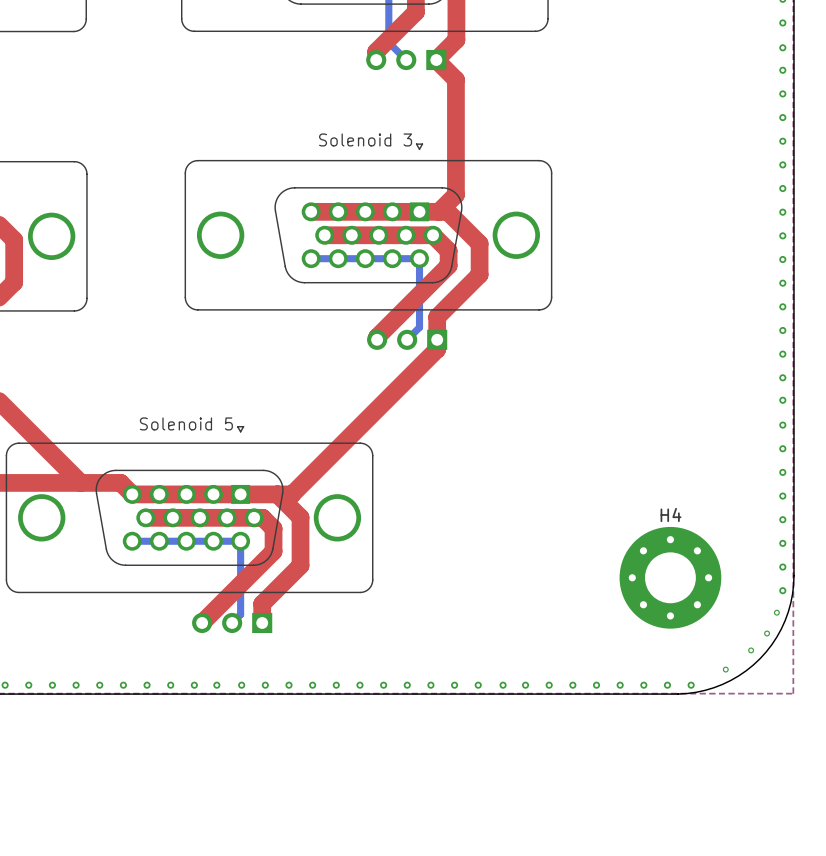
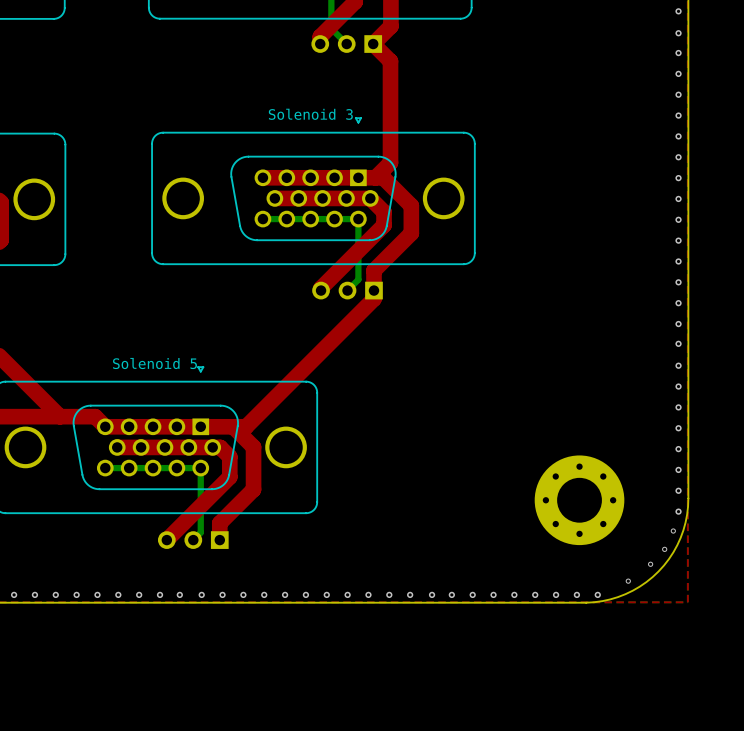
text: none -> Solenoid 5 (154, 363)
Solenoid 5 name: Solenoid 5 (186, 423) -> none
H4 name: H4 (671, 514) -> none

